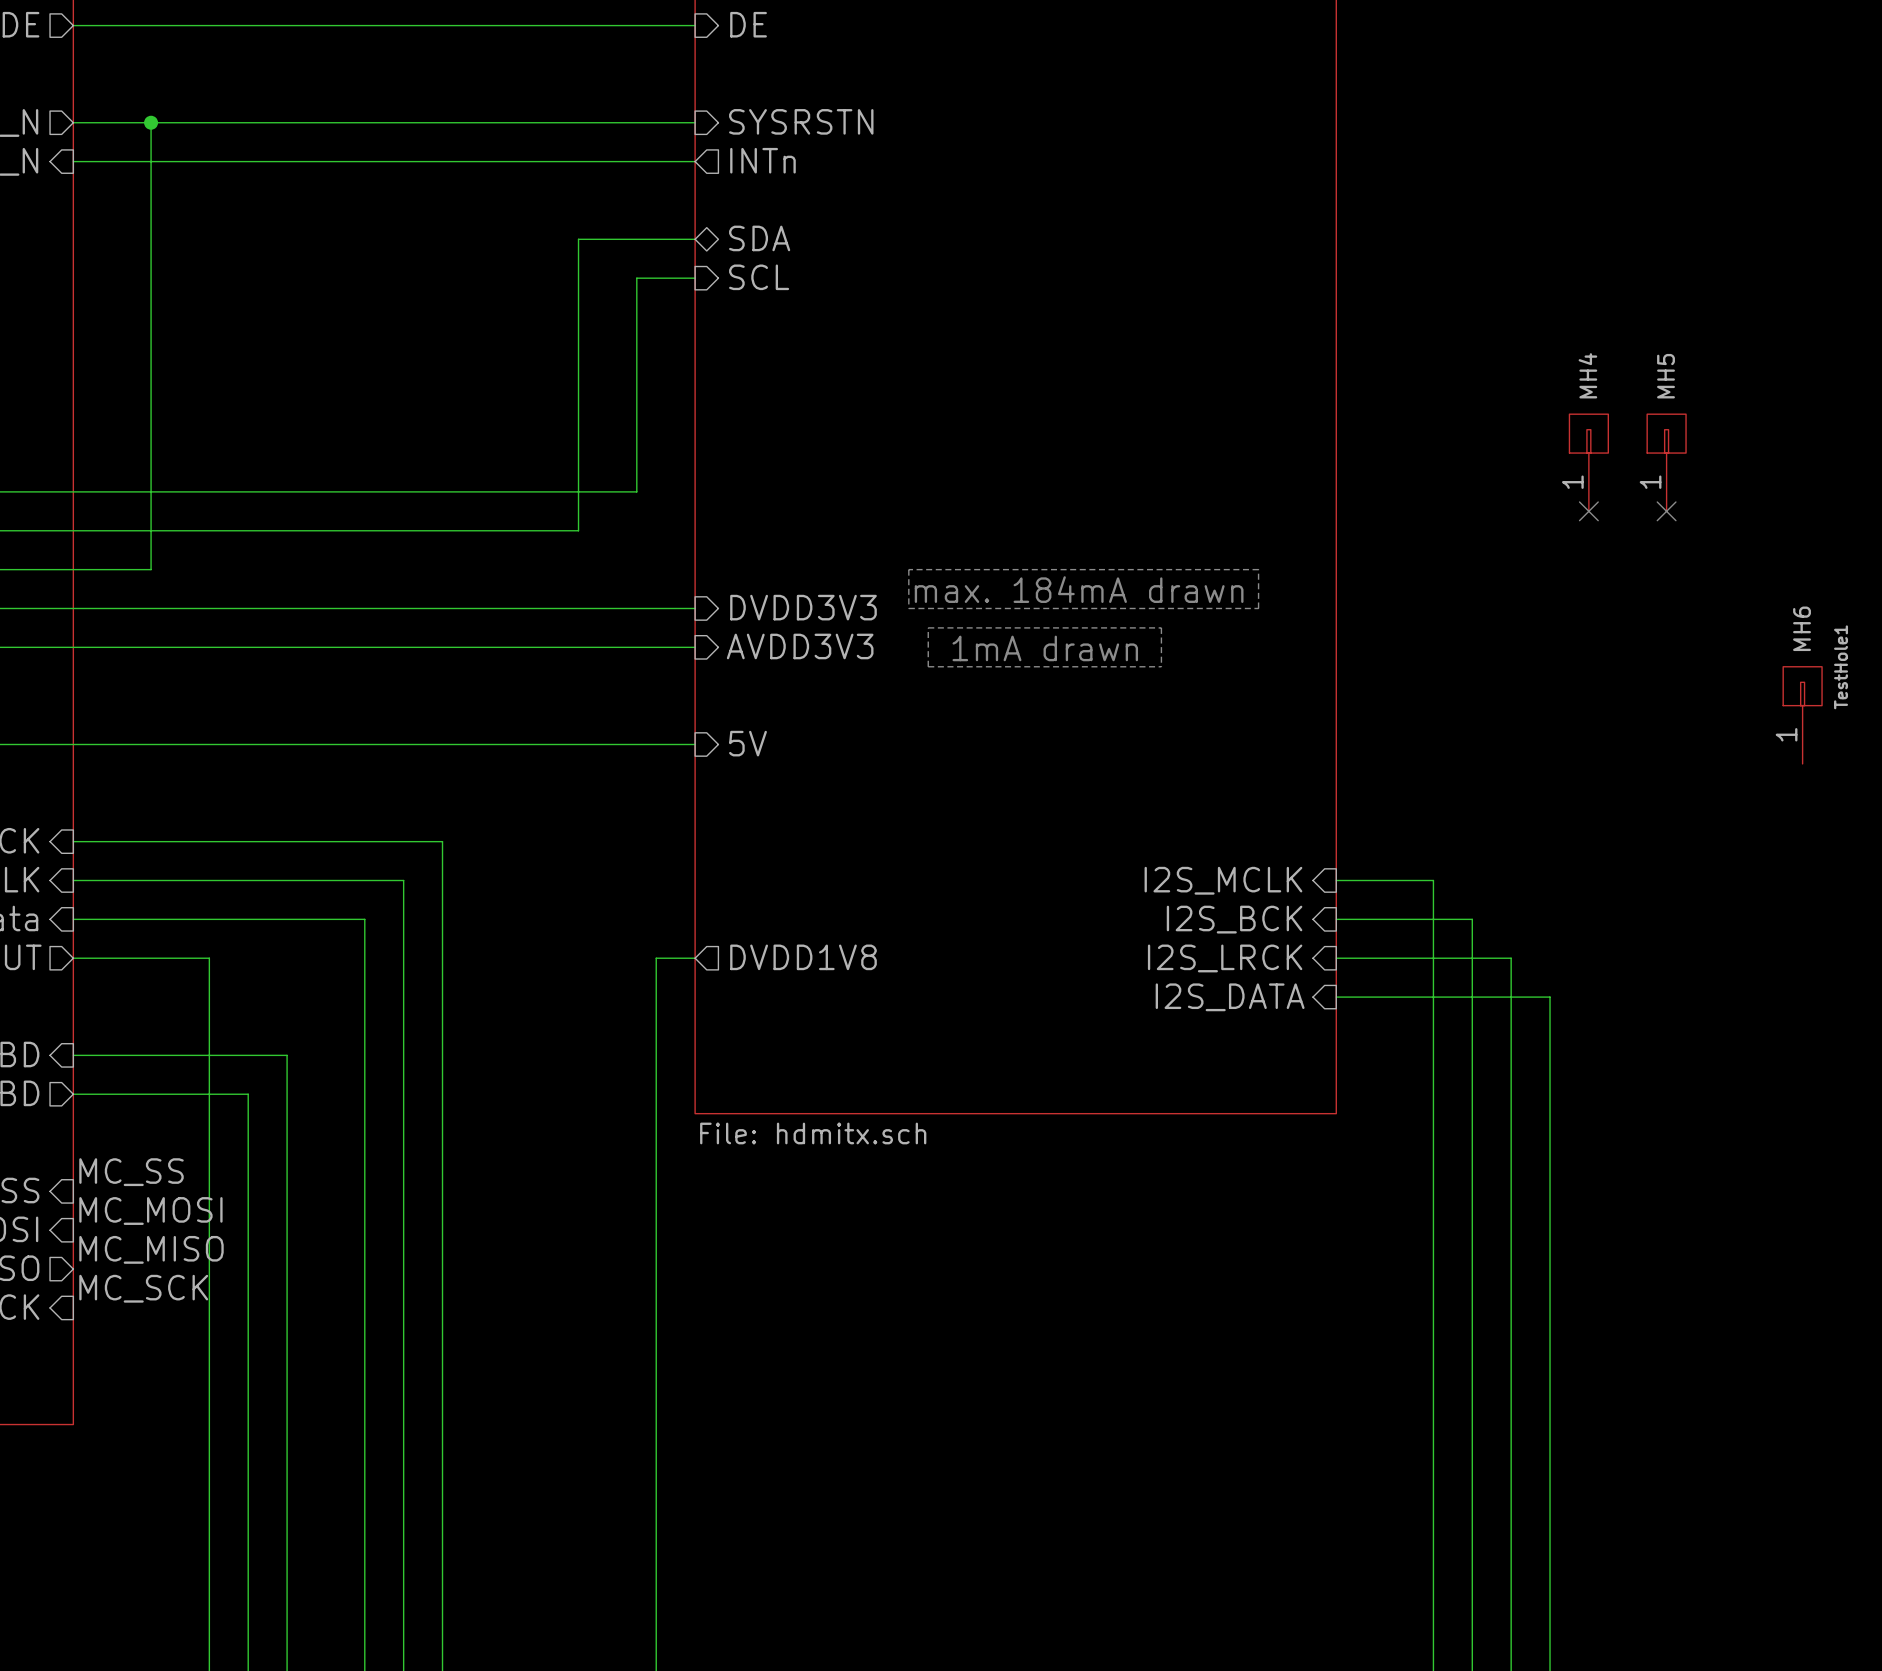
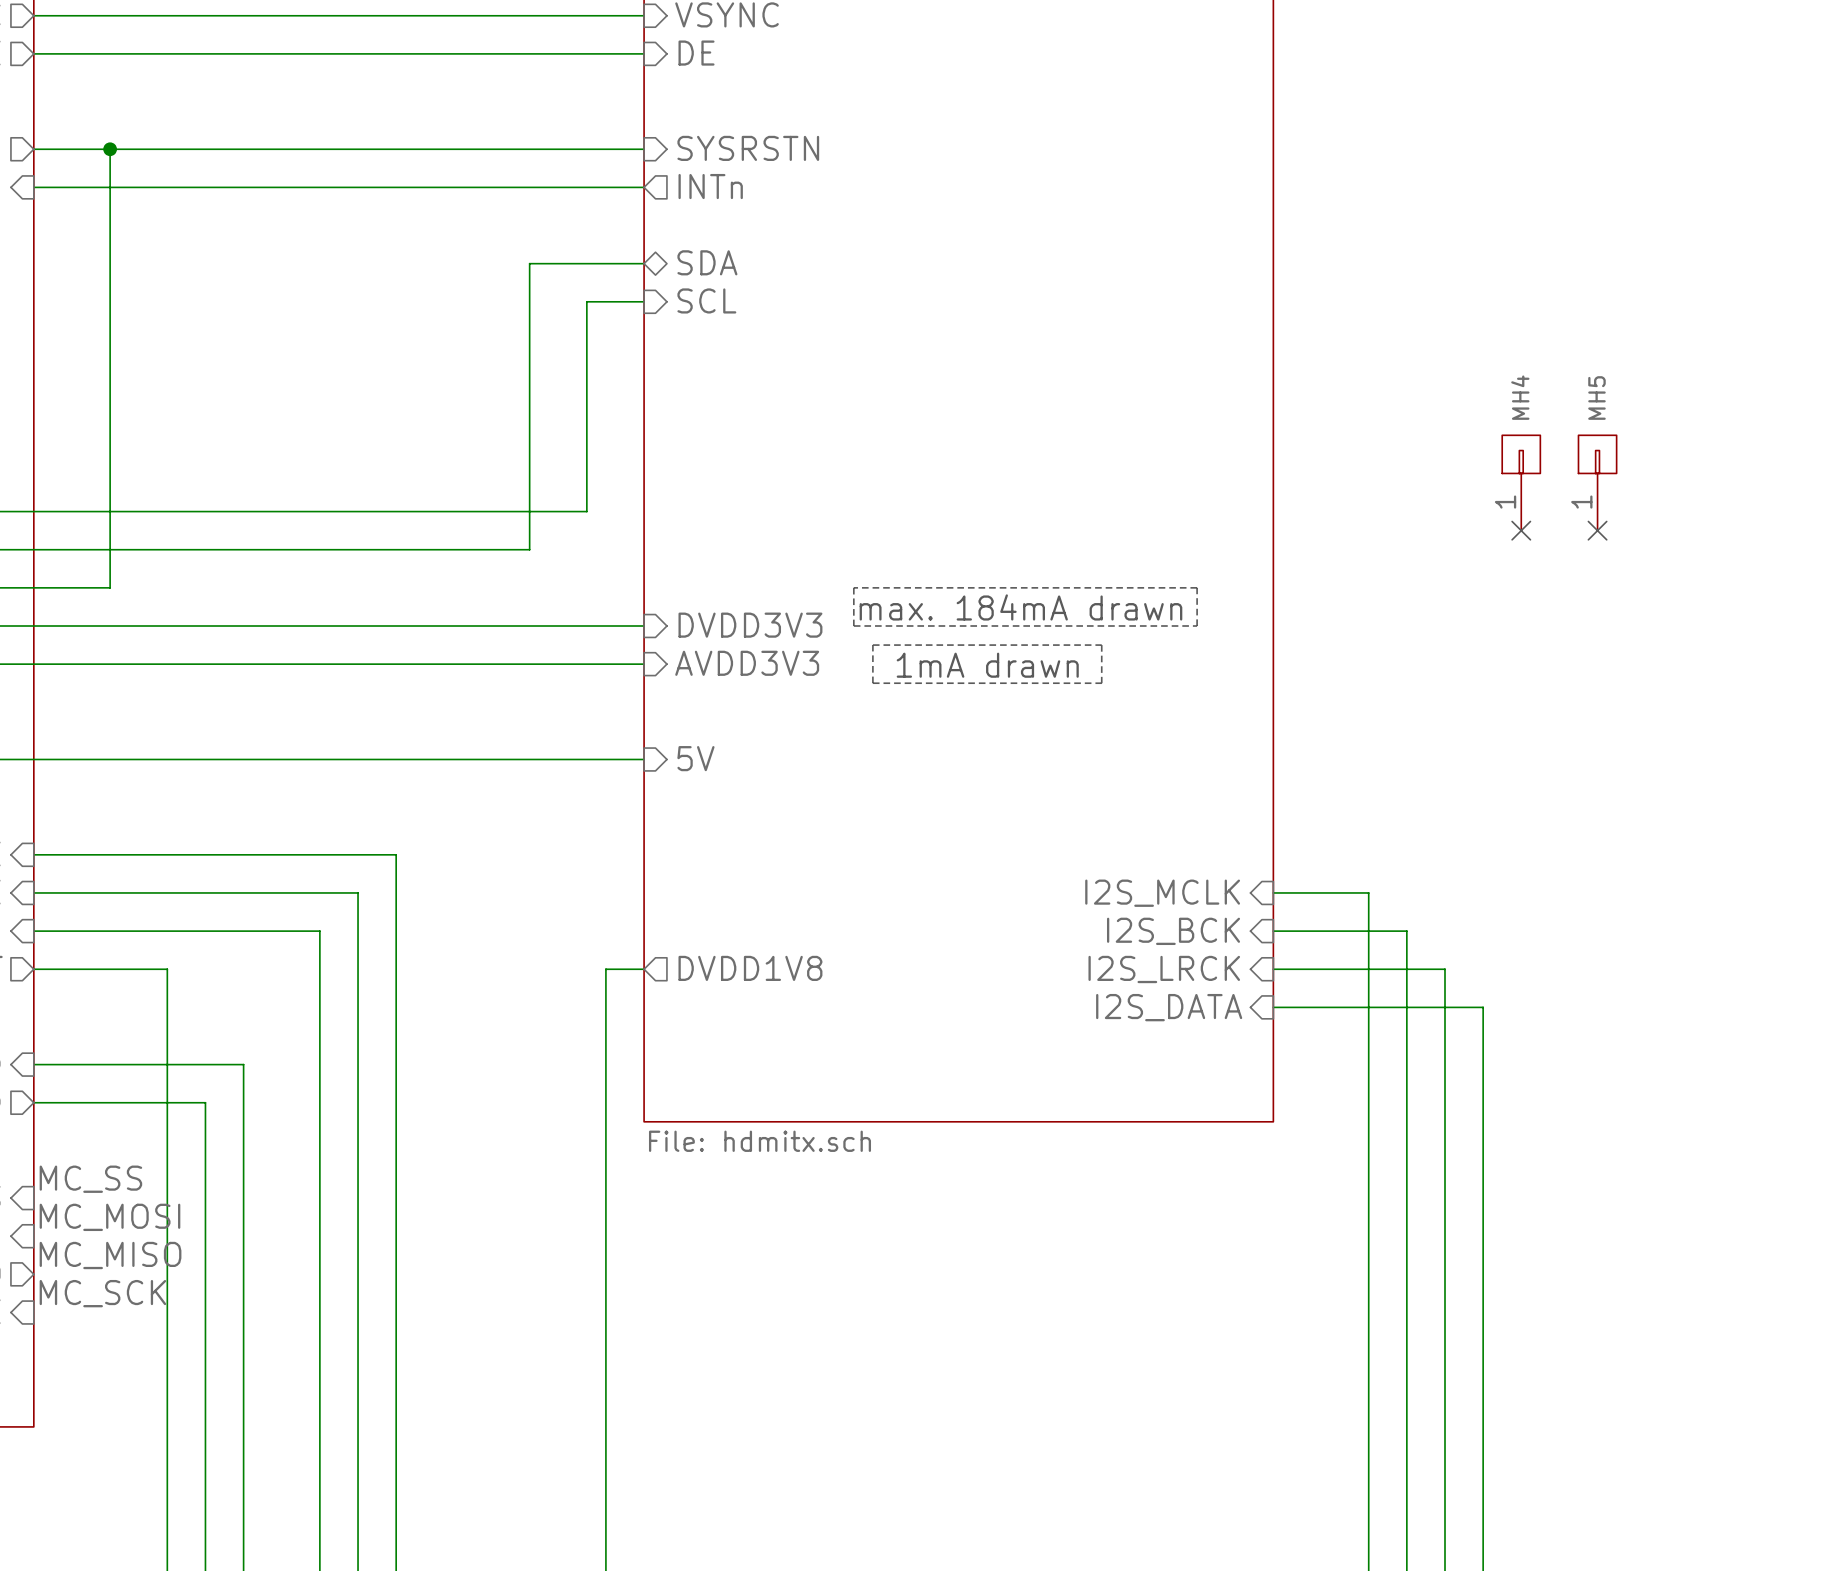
MH6: TestHole1 (1802, 715) -> none

